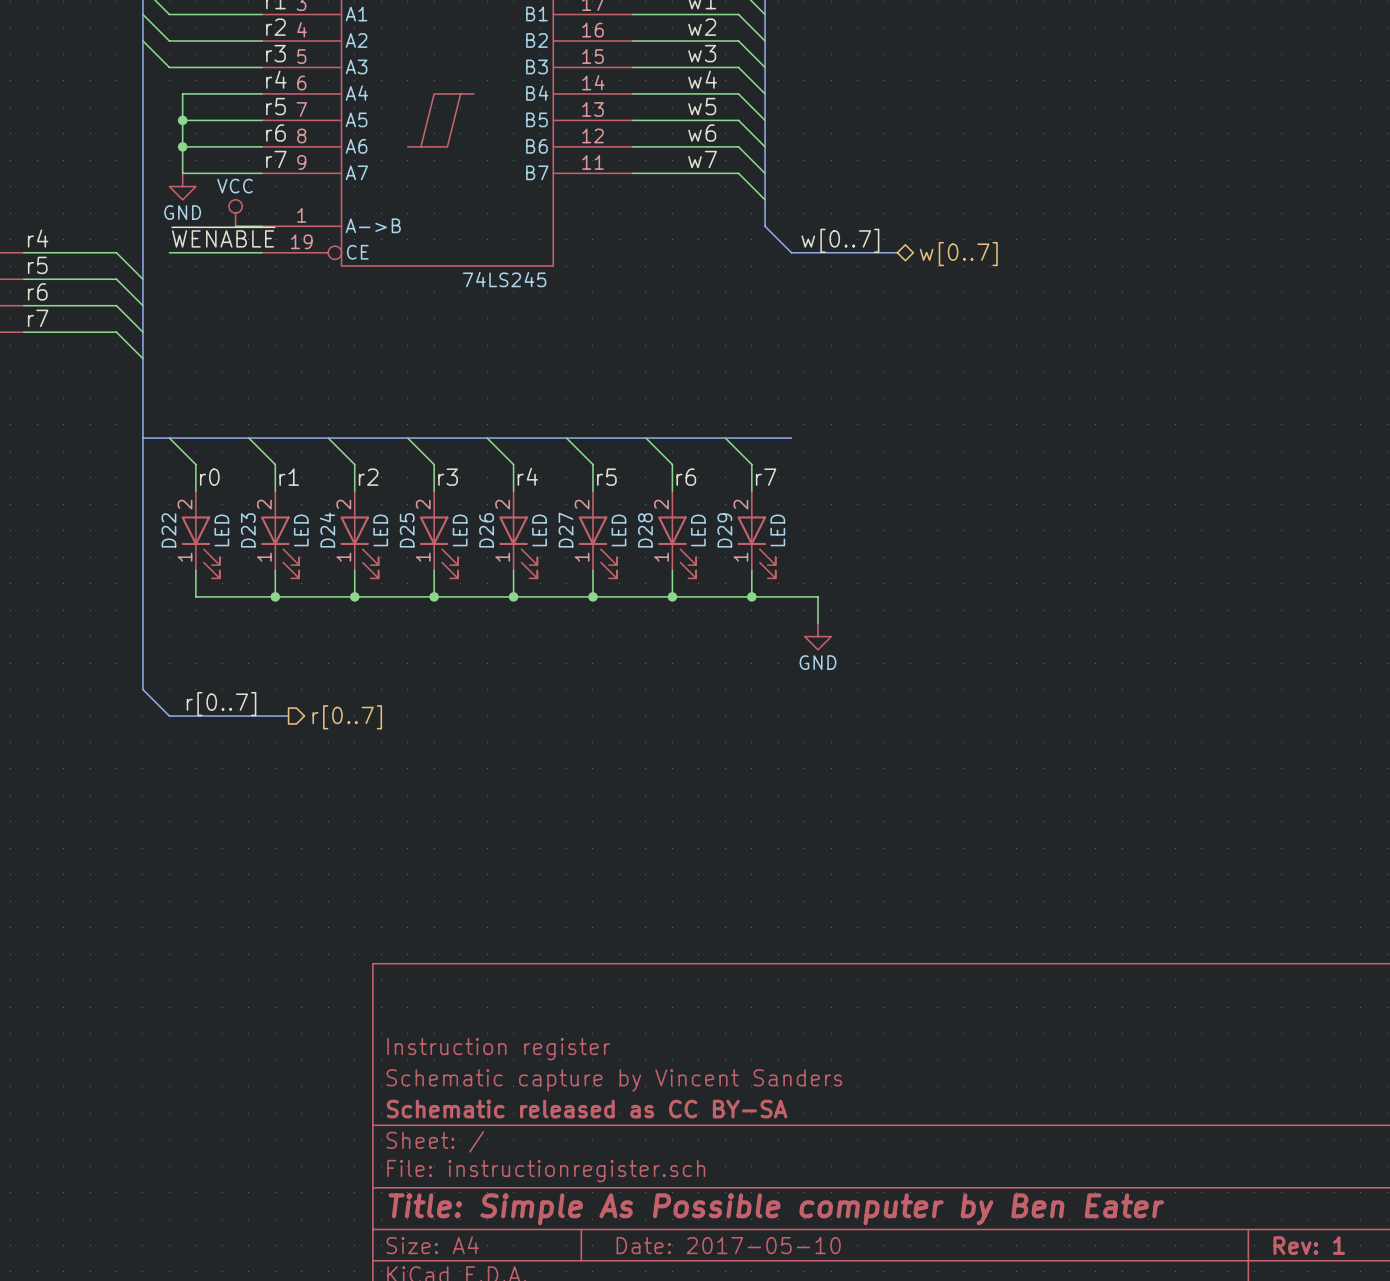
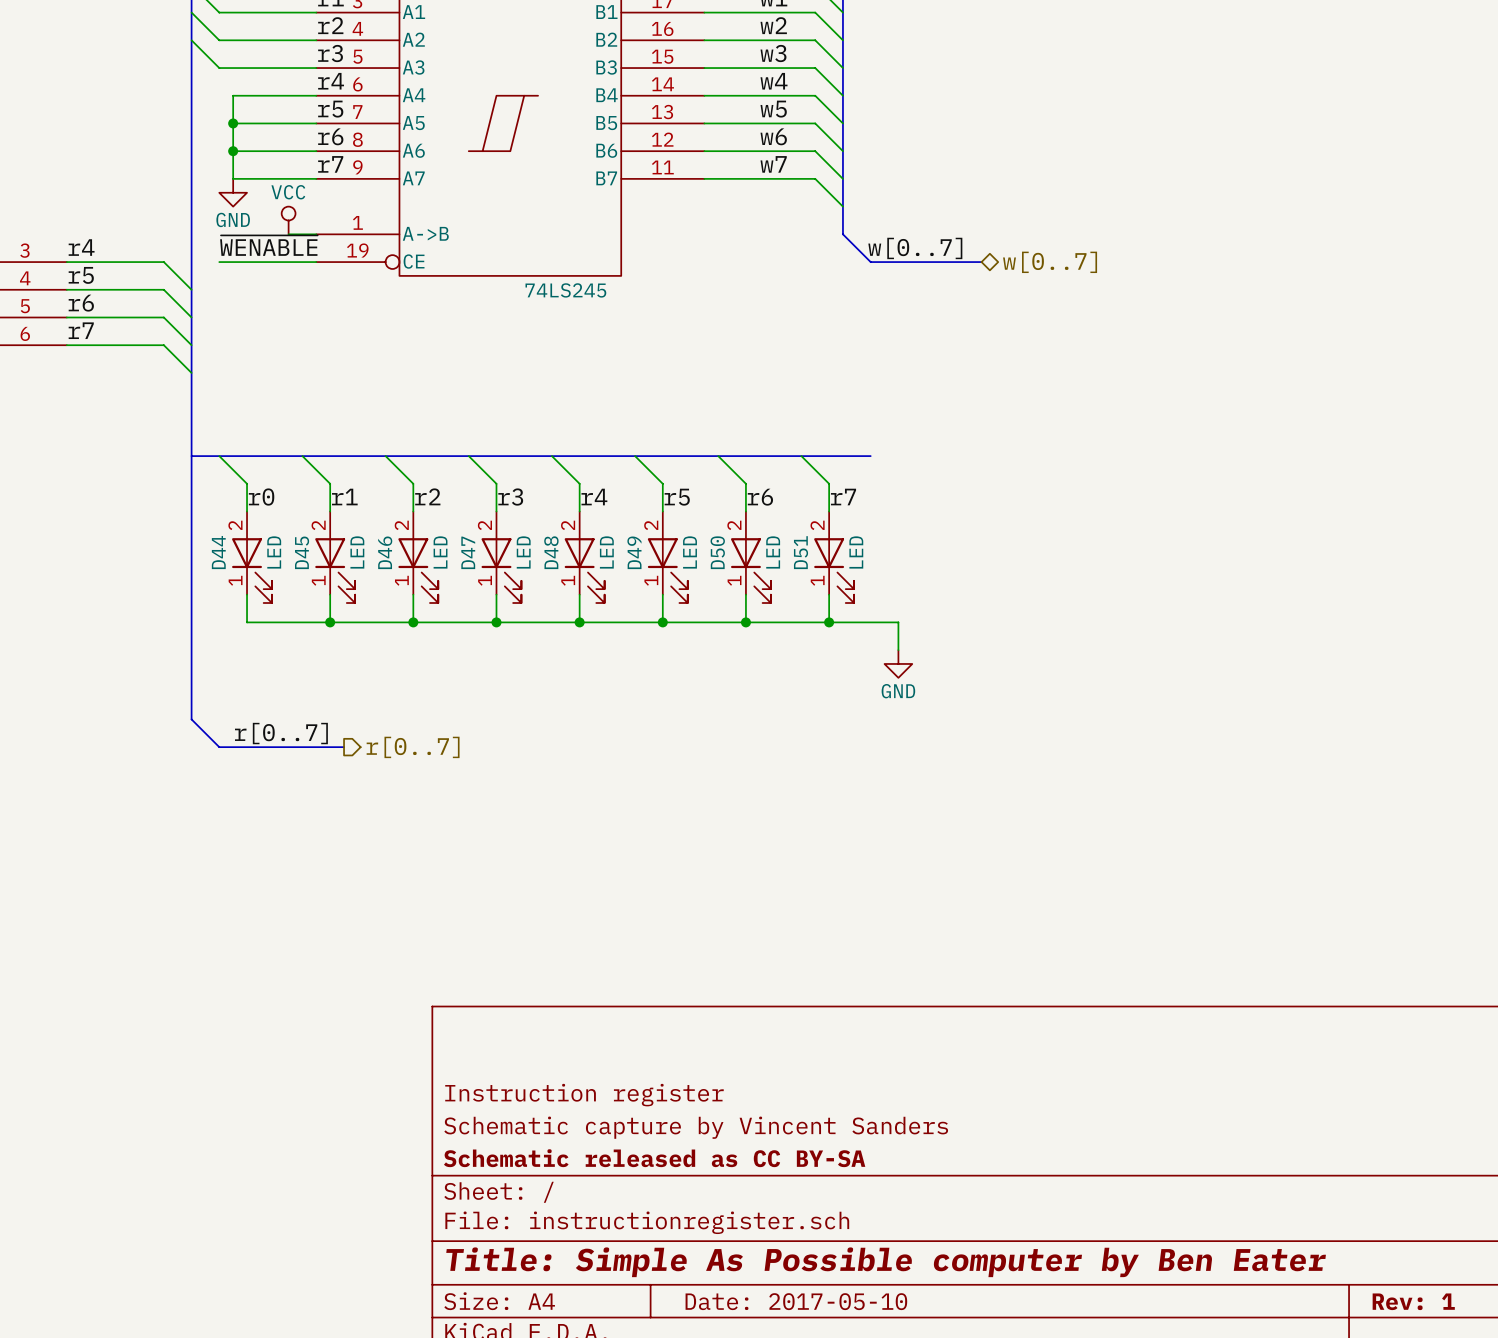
D22 name: D22 (168, 530) -> D44 (218, 552)
D23 name: D23 (248, 530) -> D45 (302, 552)
D24 name: D24 (327, 530) -> D46 (385, 552)
D25 name: D25 (407, 530) -> D47 (468, 552)
D26 name: D26 (486, 530) -> D48 (551, 552)
D27 name: D27 (566, 530) -> D49 (634, 552)
D28 name: D28 (645, 530) -> D50 (717, 552)
D29 name: D29 (724, 530) -> D51 (801, 552)

